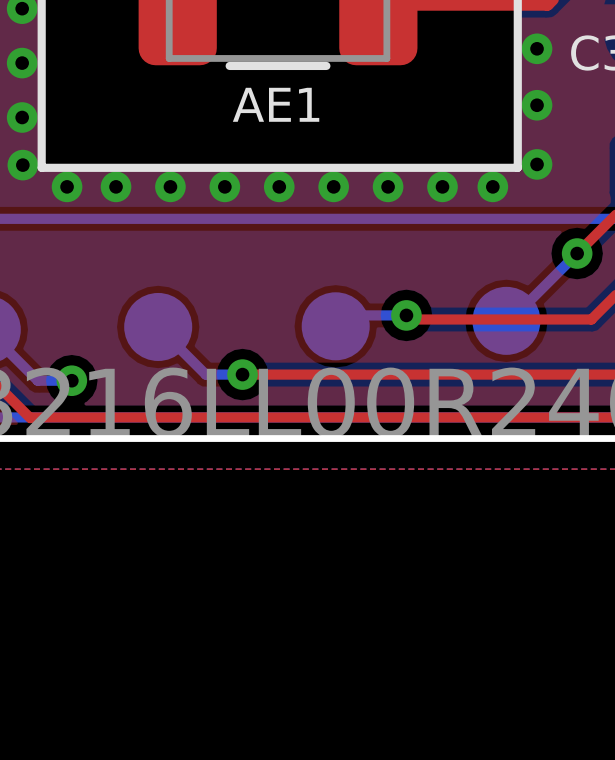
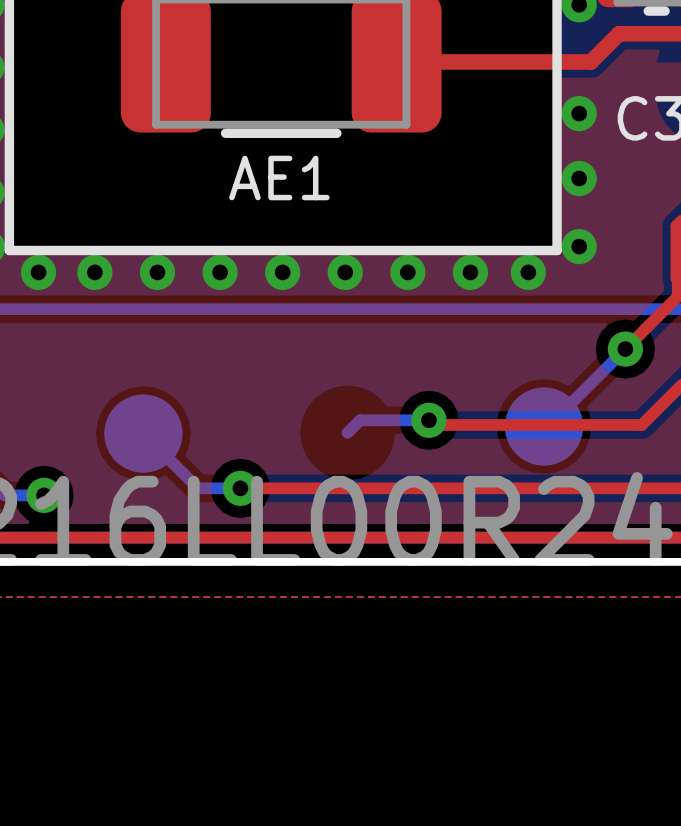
part: (335, 326) -> none

